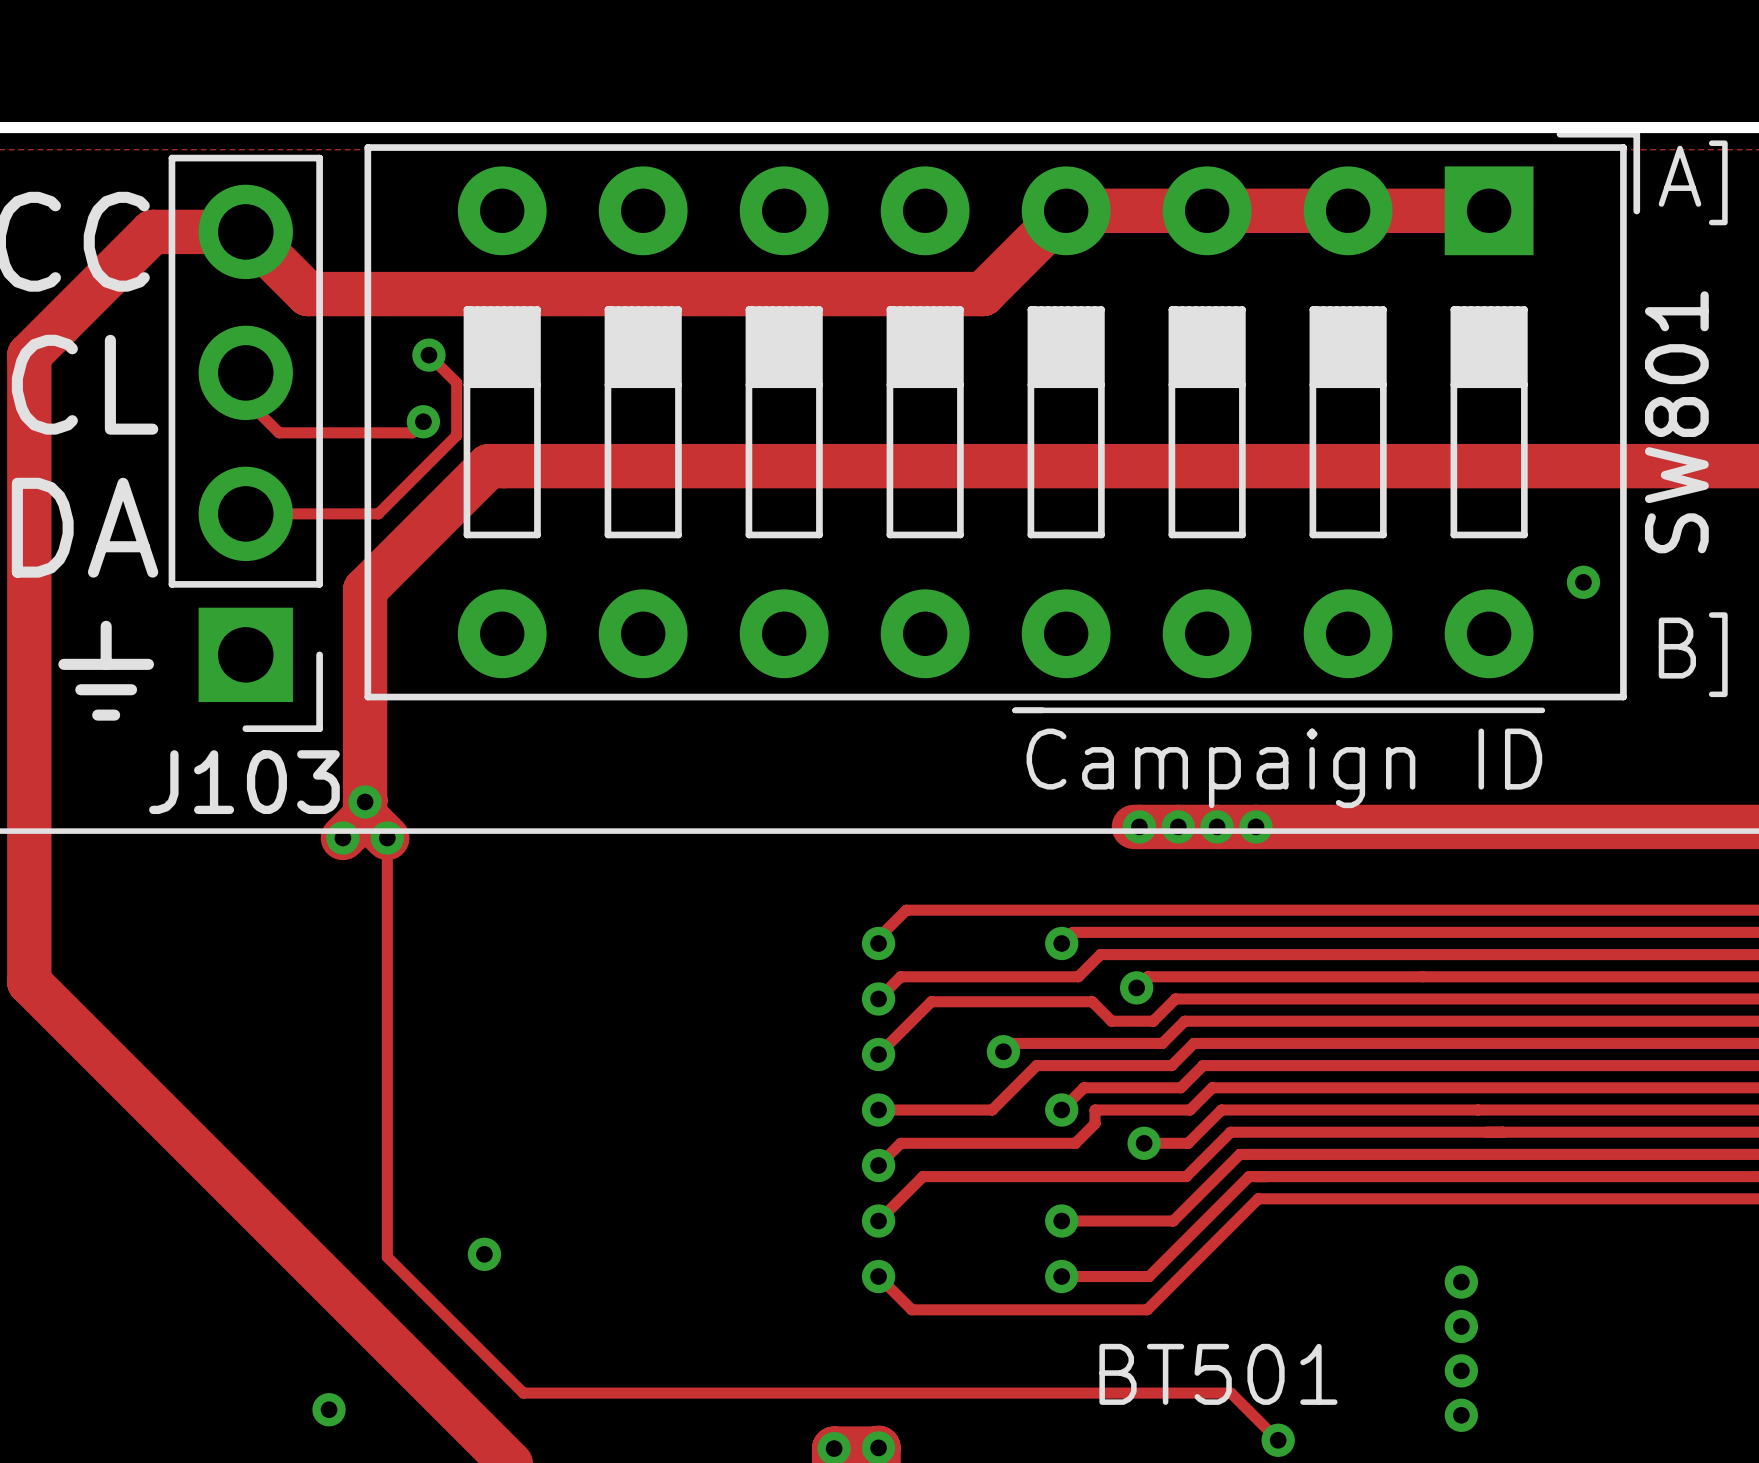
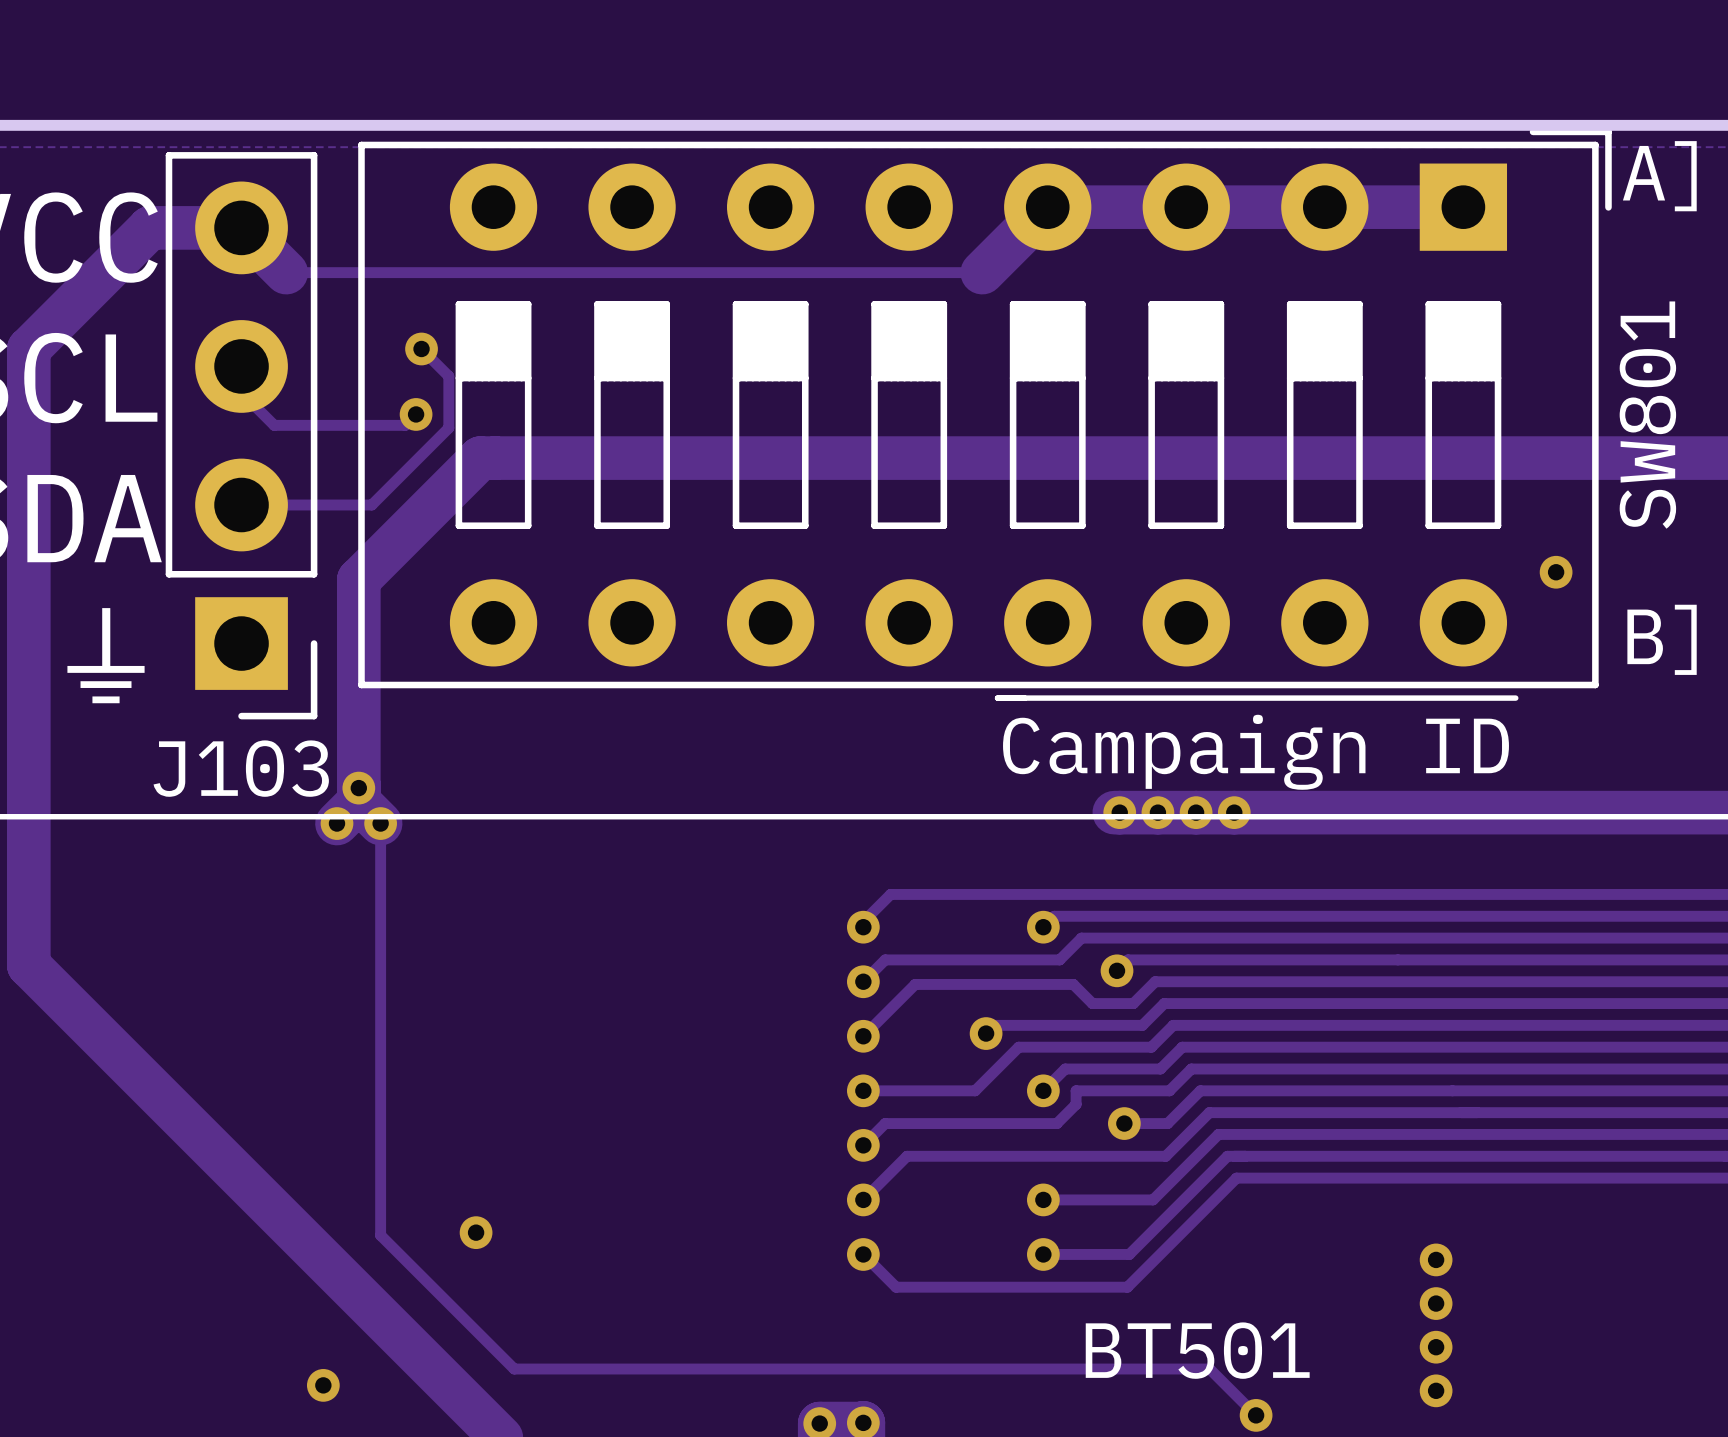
track: (291, 277) (307, 294) (982, 294) (999, 277) -> (286, 272) (982, 272)

